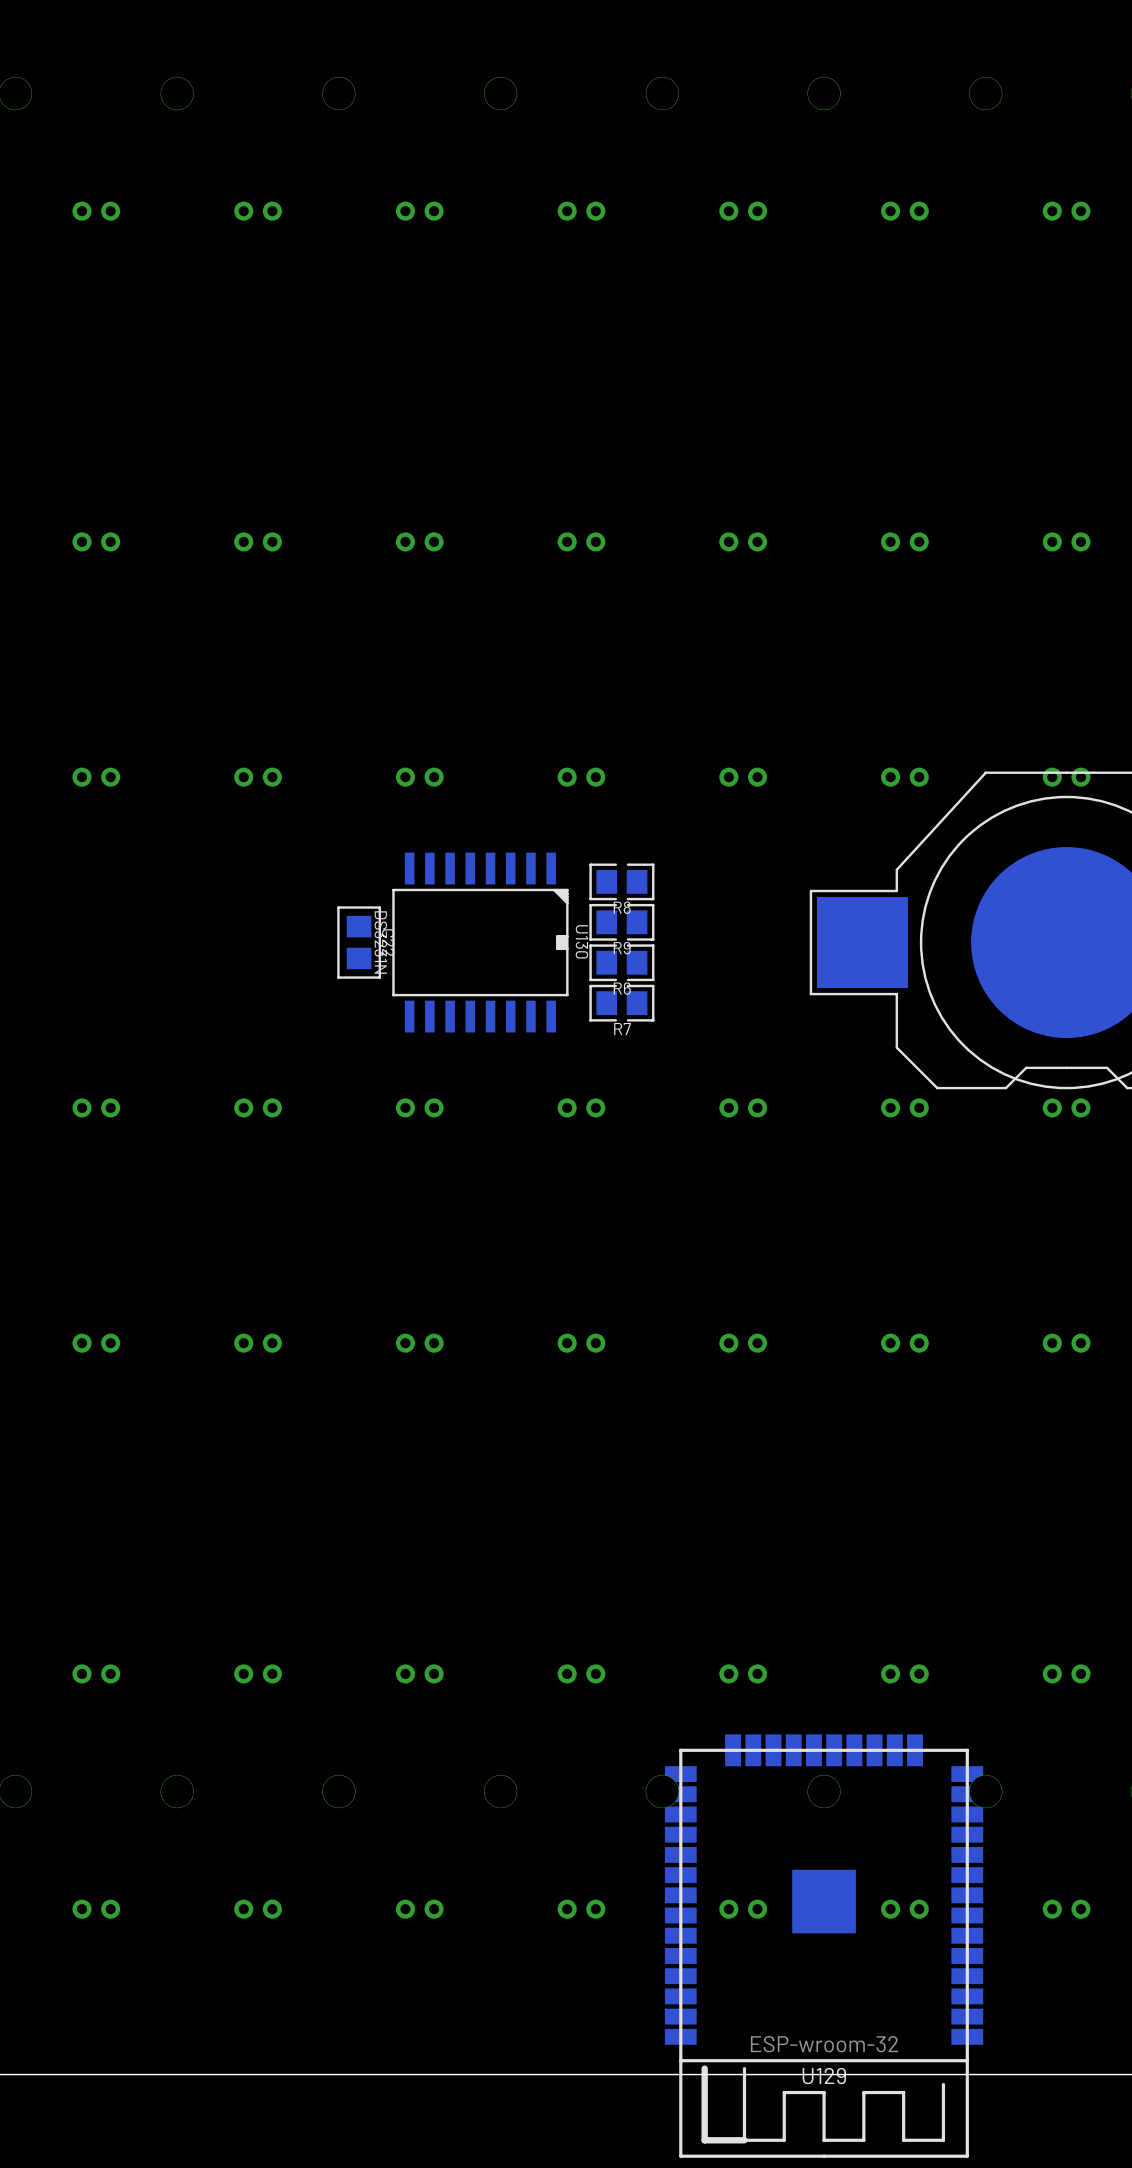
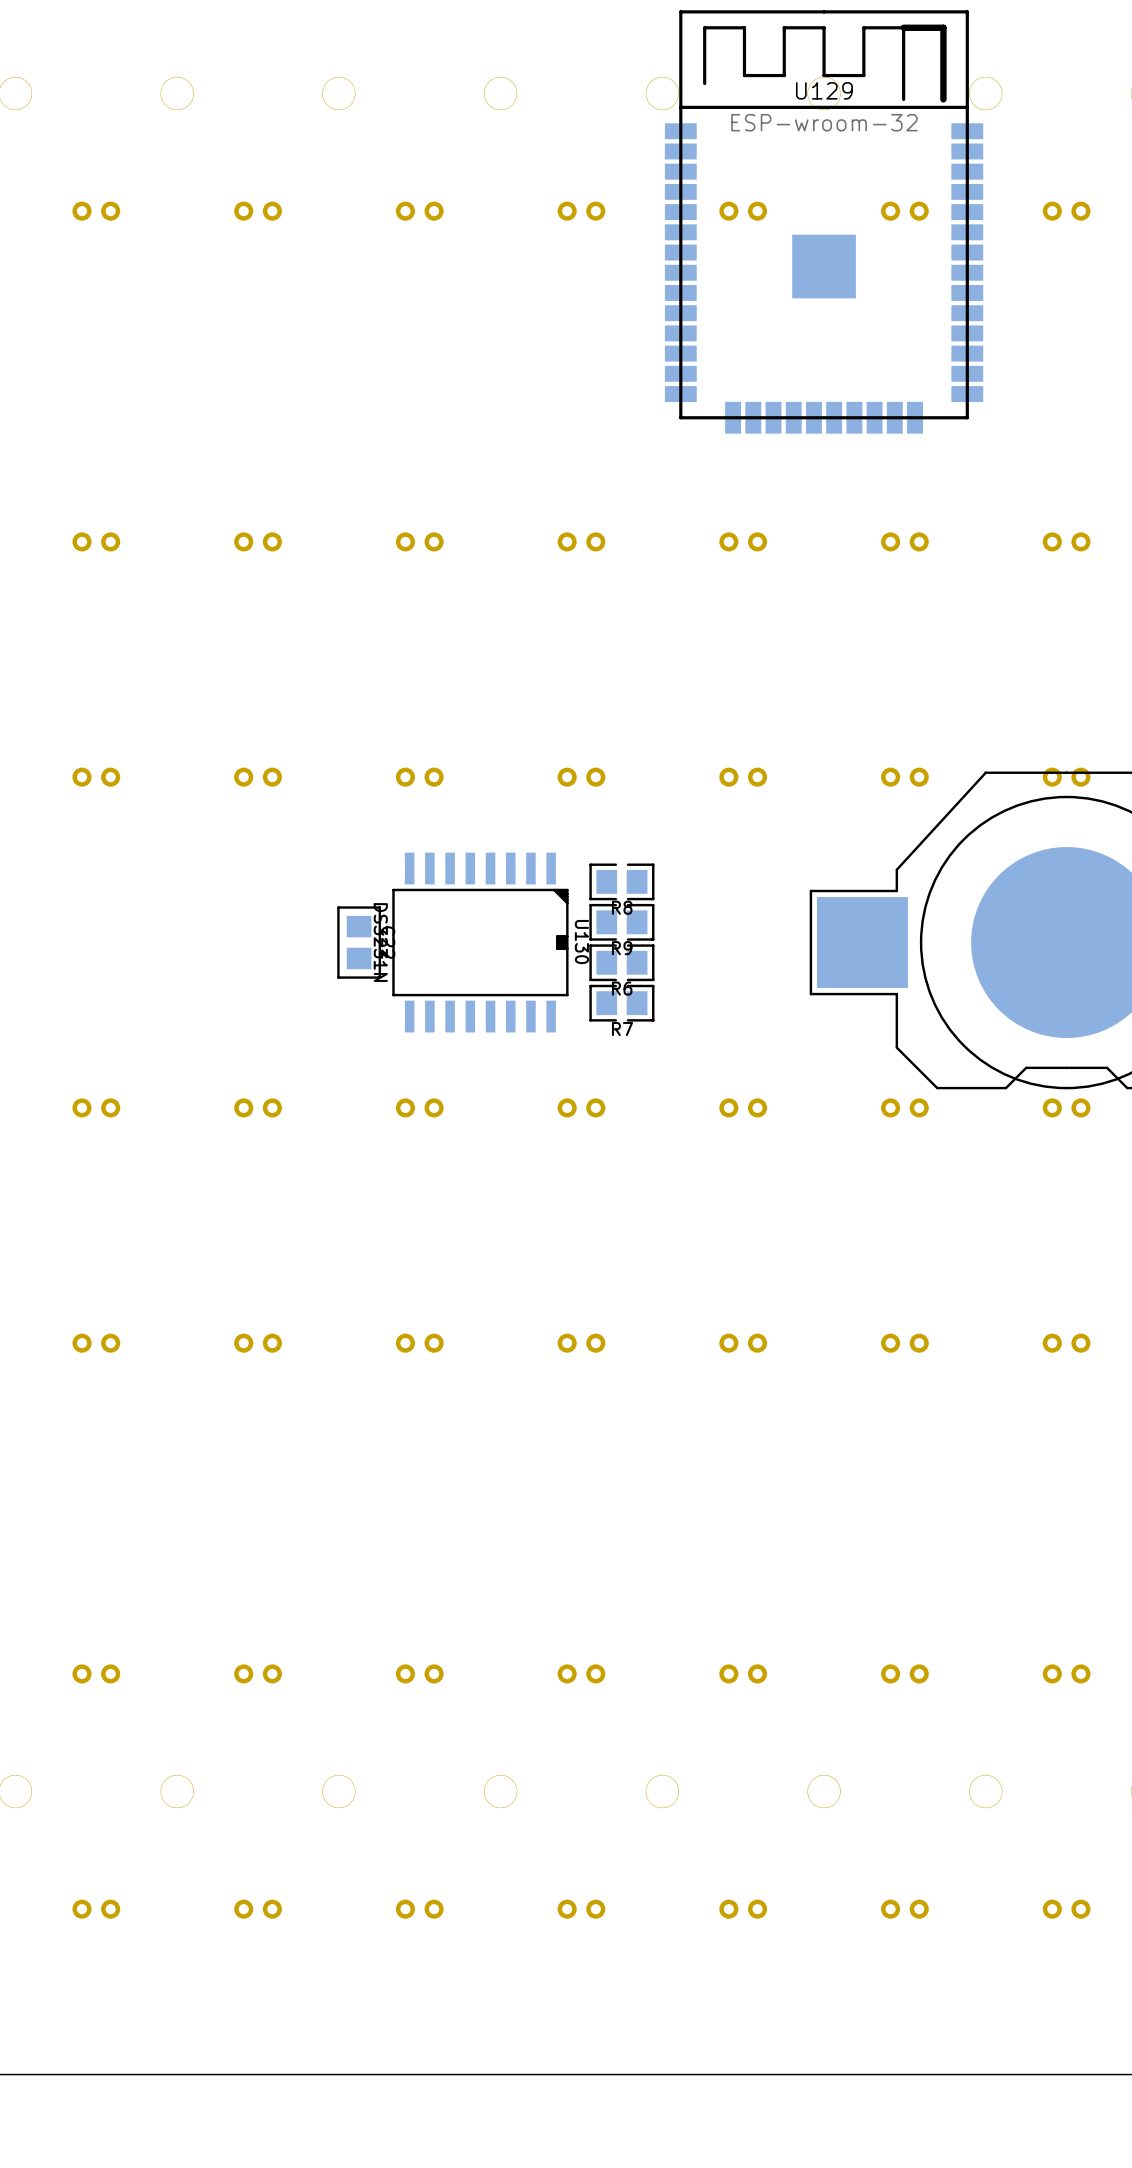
U129 rotation: 0° (824, 1946) -> 180° (824, 221)
U129 position: (824, 1946) -> (824, 221)

